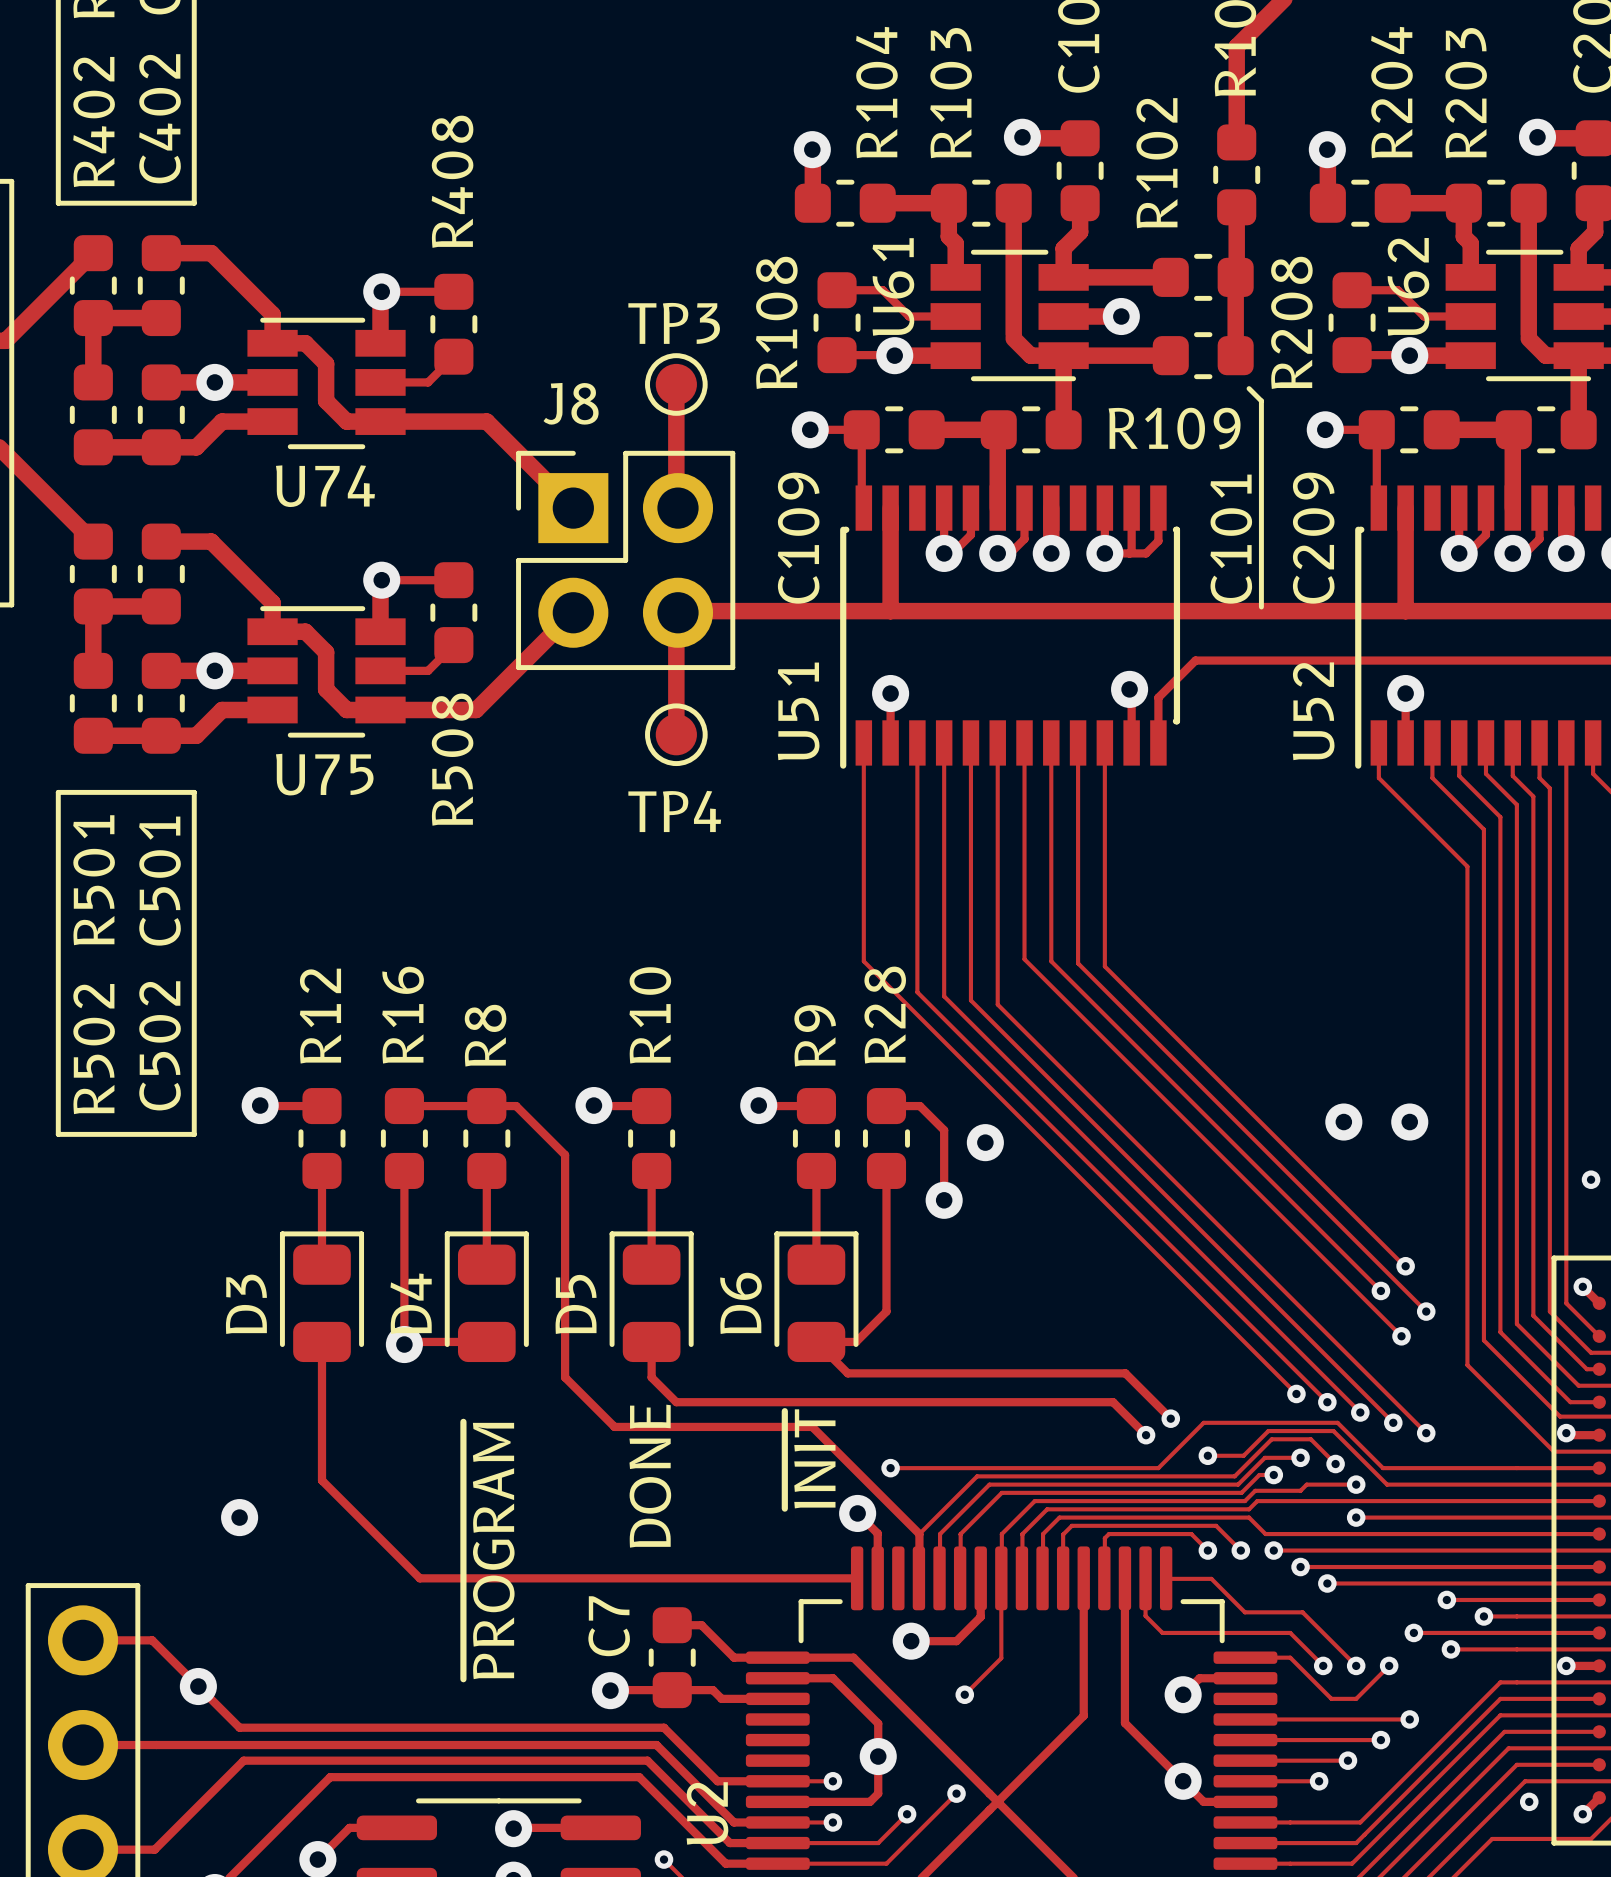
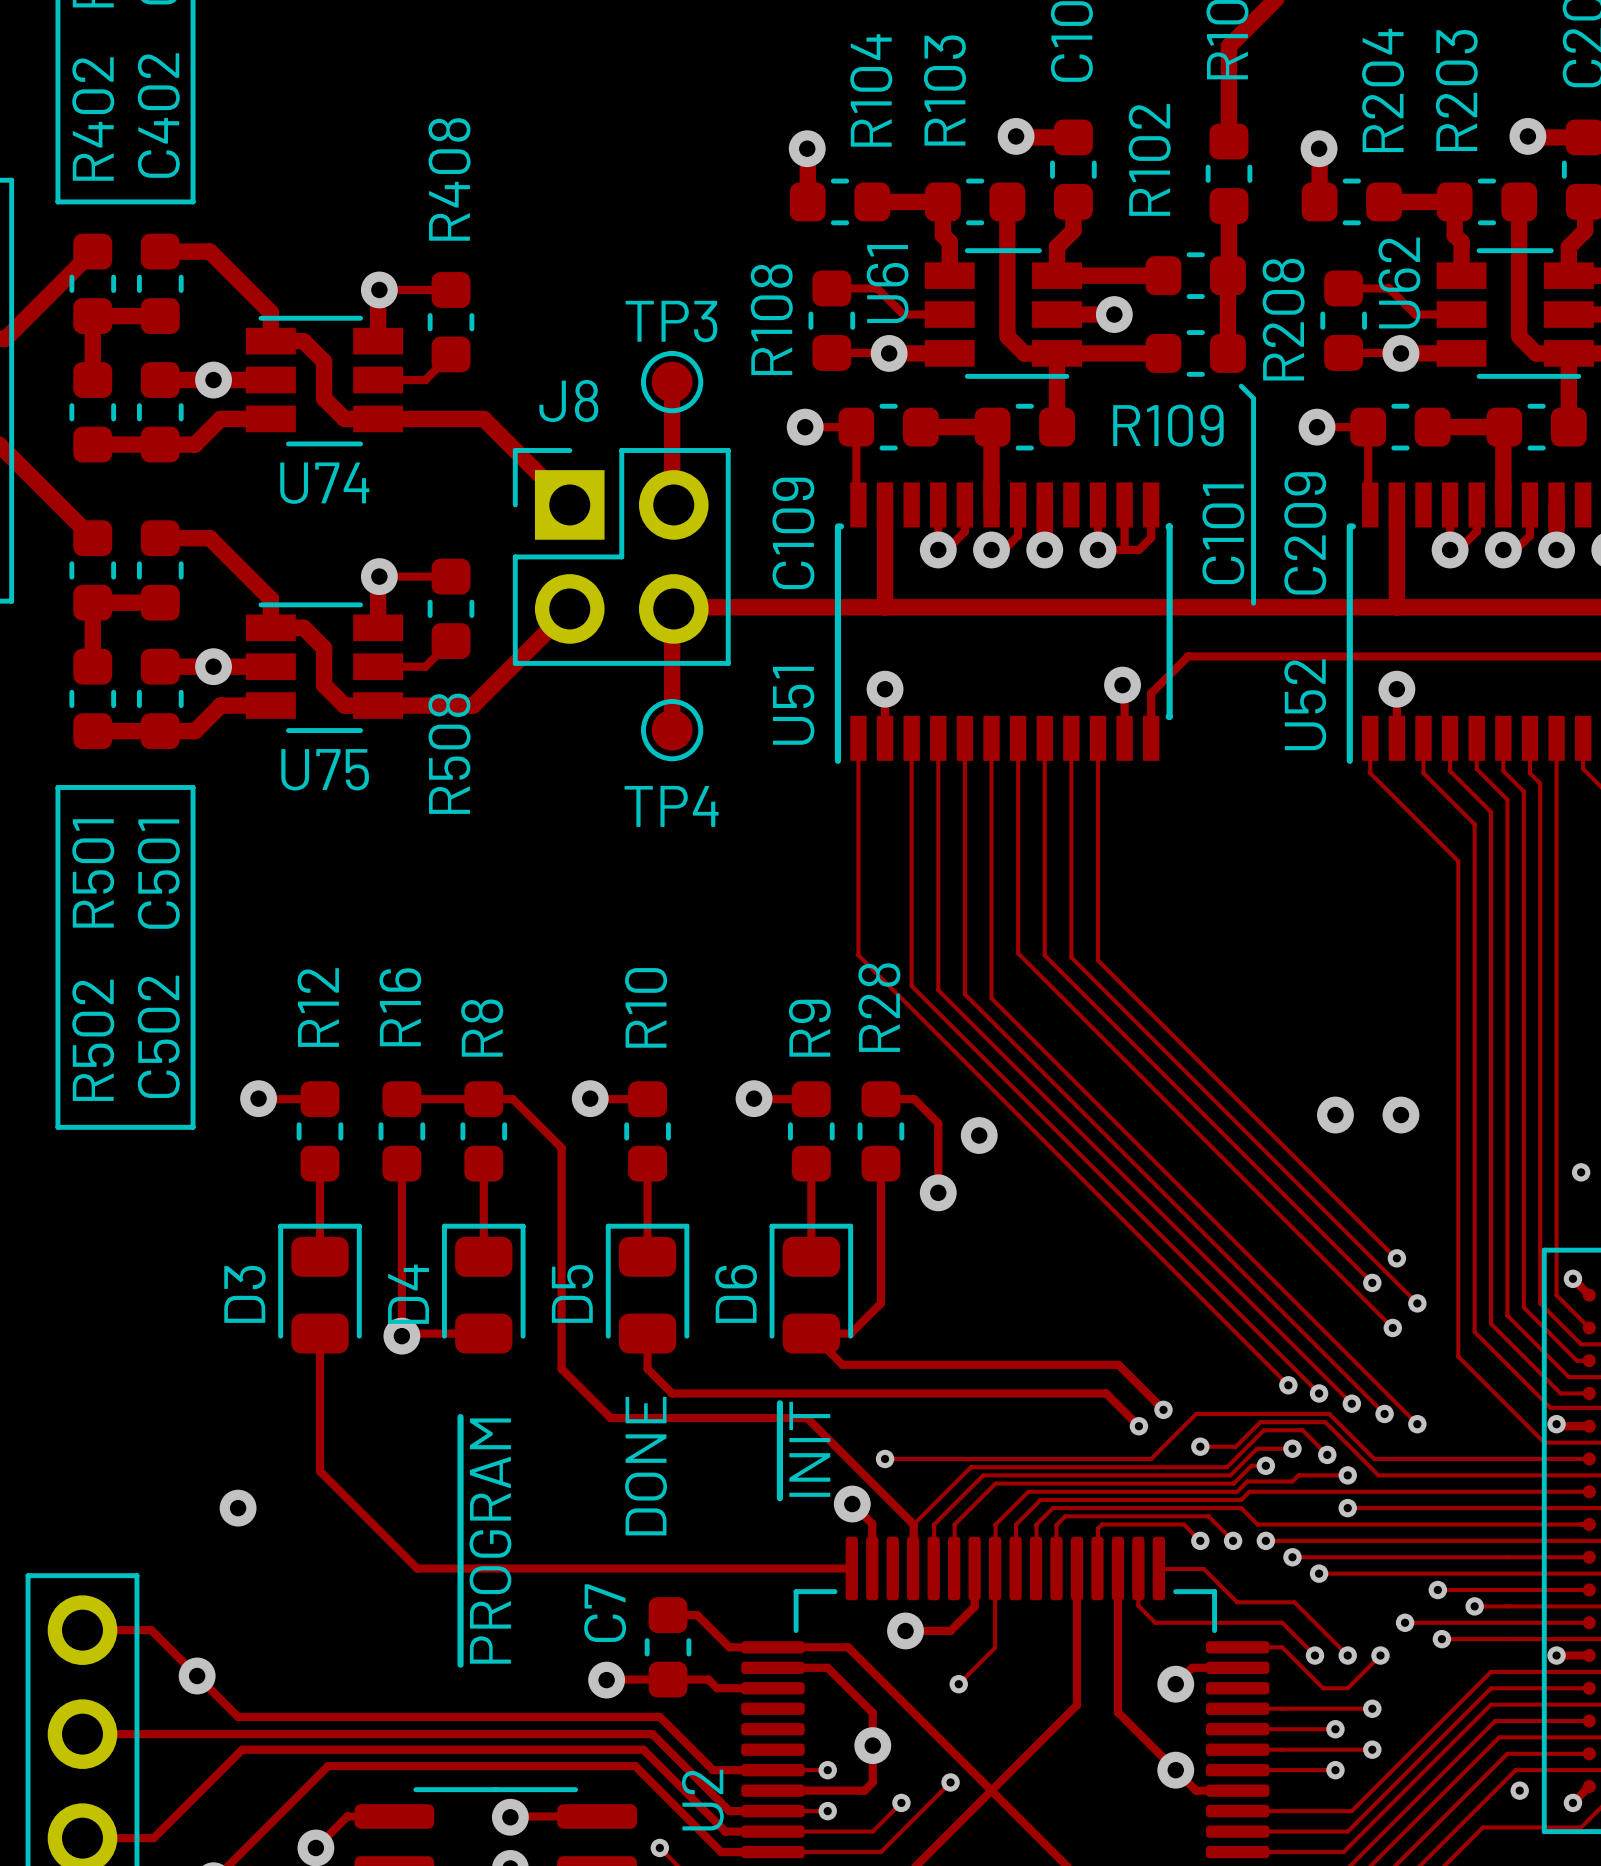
track: (1380, 1719) (1409, 1719) -> none
via: none -> (1372, 1708)
via: (1409, 1719) -> none
track: (1343, 1740) (1380, 1740) -> none
via: none -> (1335, 1729)
via: (1380, 1740) -> none
track: none -> (1339, 1749) (1372, 1749)
via: (1347, 1760) -> none
via: none -> (1372, 1749)
track: none -> (1310, 1770) (1335, 1770)
via: (1319, 1781) -> none
via: none -> (1335, 1770)

